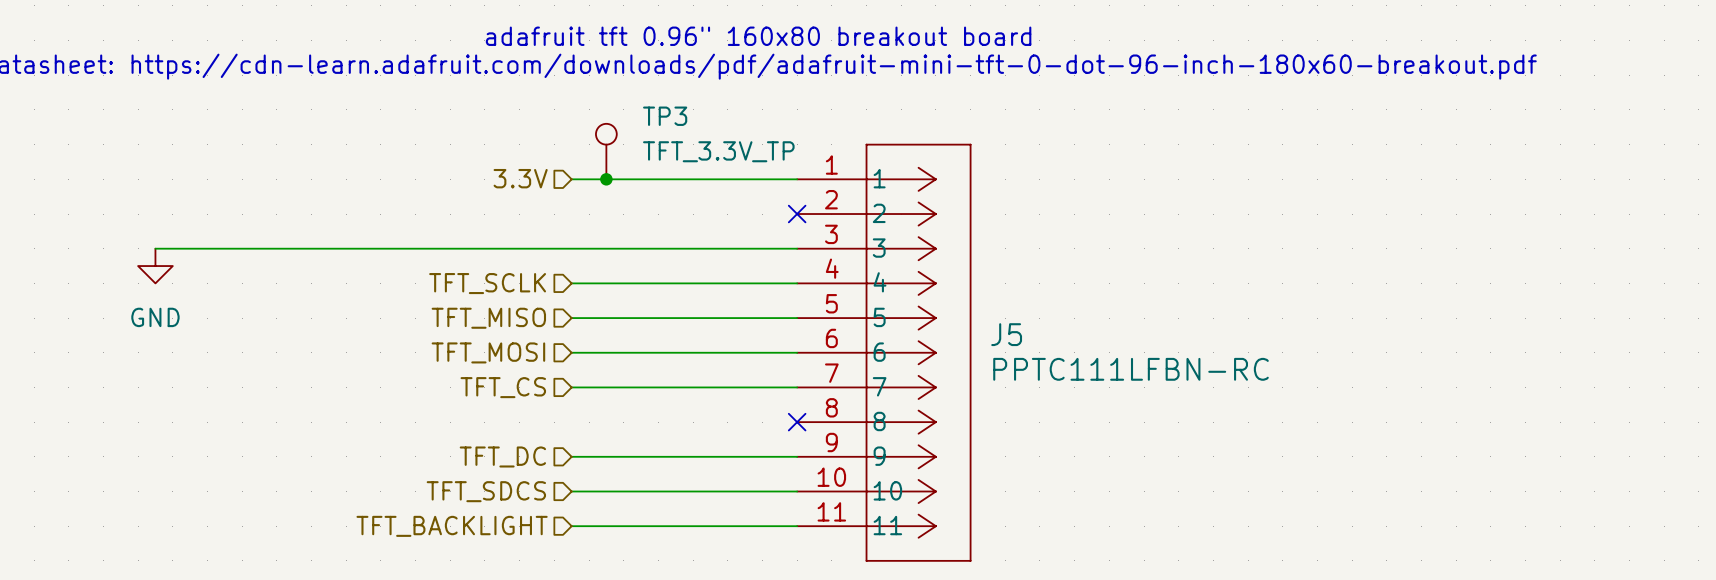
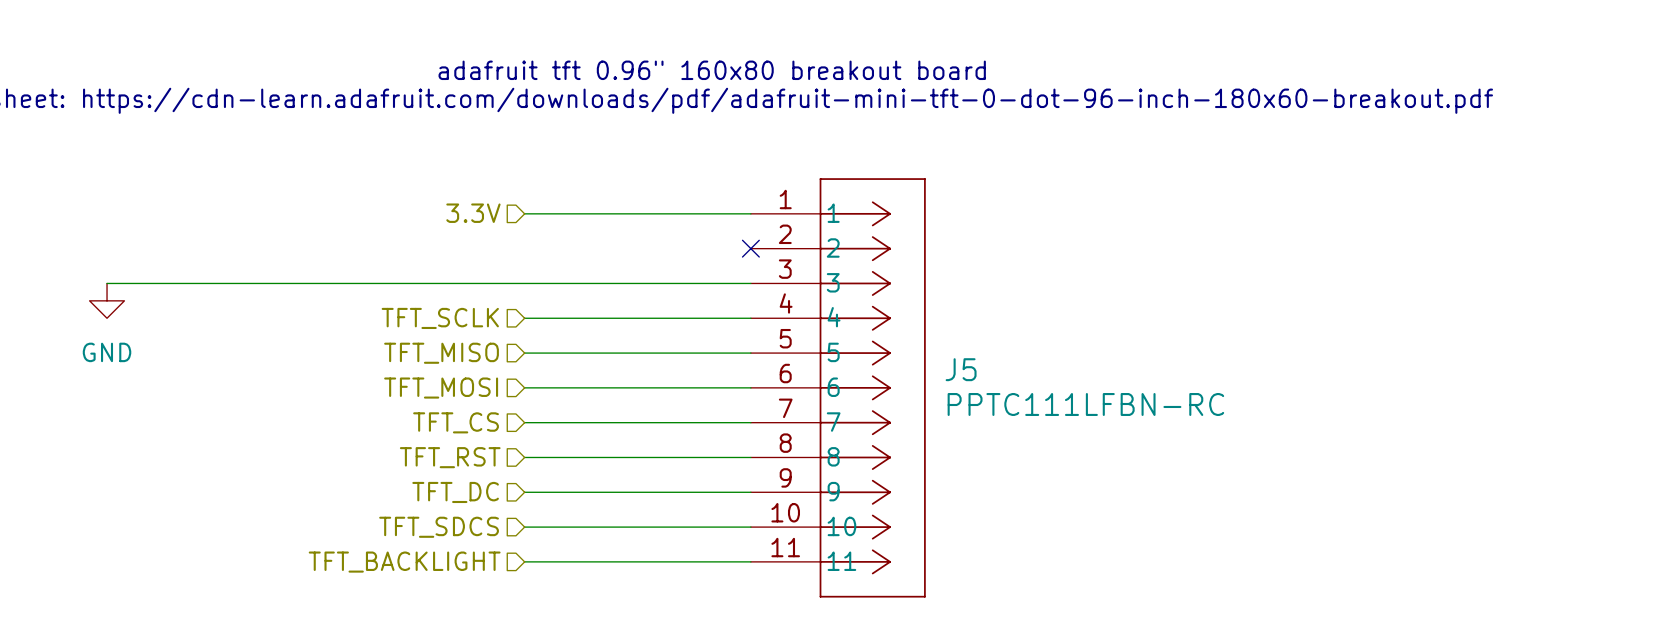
TP3: TFT_3.3V_TP (606, 151) -> none
junction: (606, 179) -> none
hierarchical label: none -> TFT_RST (450, 457)
wire: none -> (524, 457) (750, 457)
no-connect mark: (797, 422) -> none

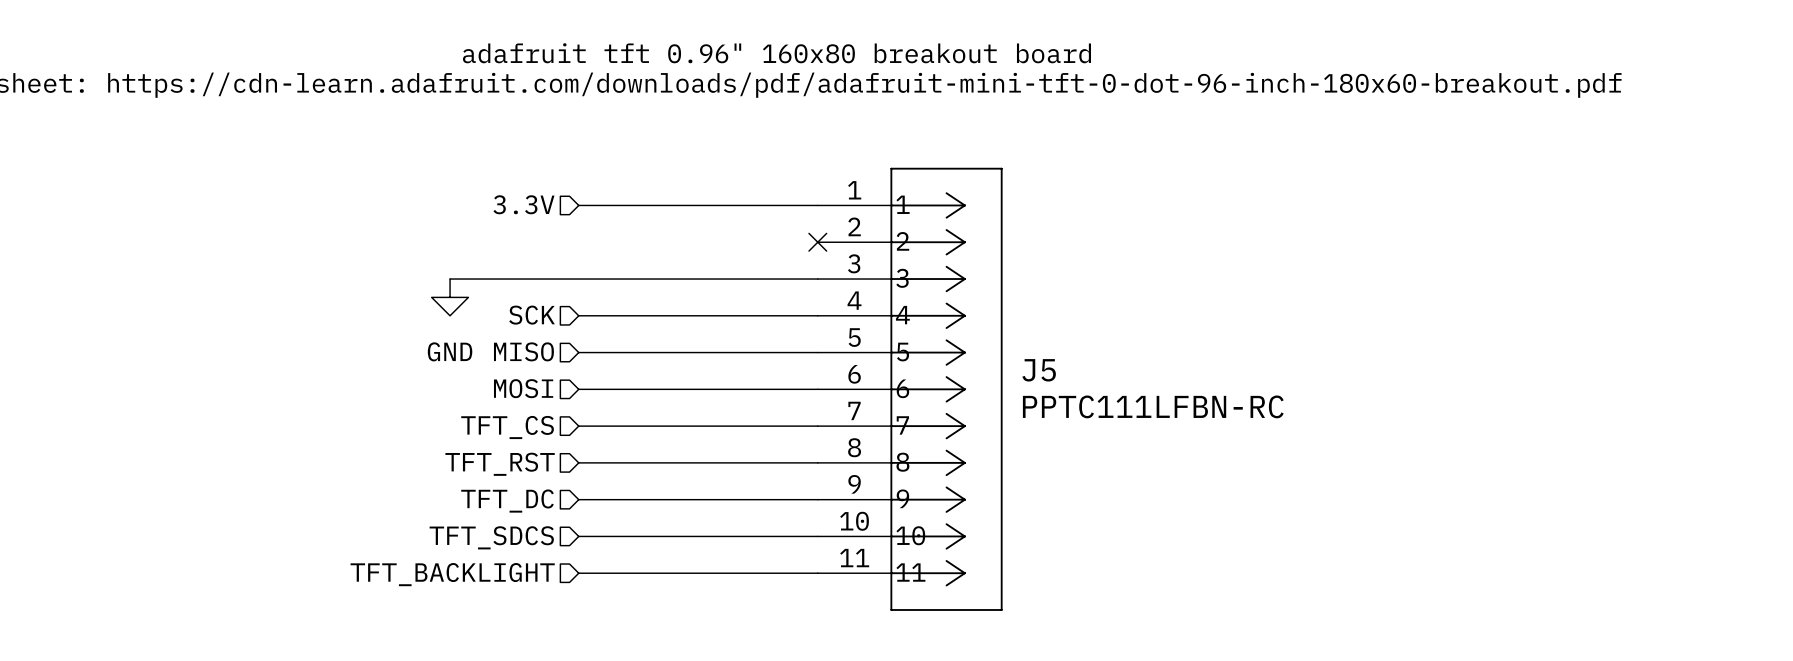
wire: (107, 283) (402, 283) -> none
power symbol position: GND (107, 300) -> GND (450, 297)
hierarchical label: TFT_SCLK (440, 318) -> SCK (532, 315)
hierarchical label: TFT_MISO (441, 353) -> MISO (523, 351)
hierarchical label: TFT_MOSI (441, 388) -> MOSI (523, 388)

